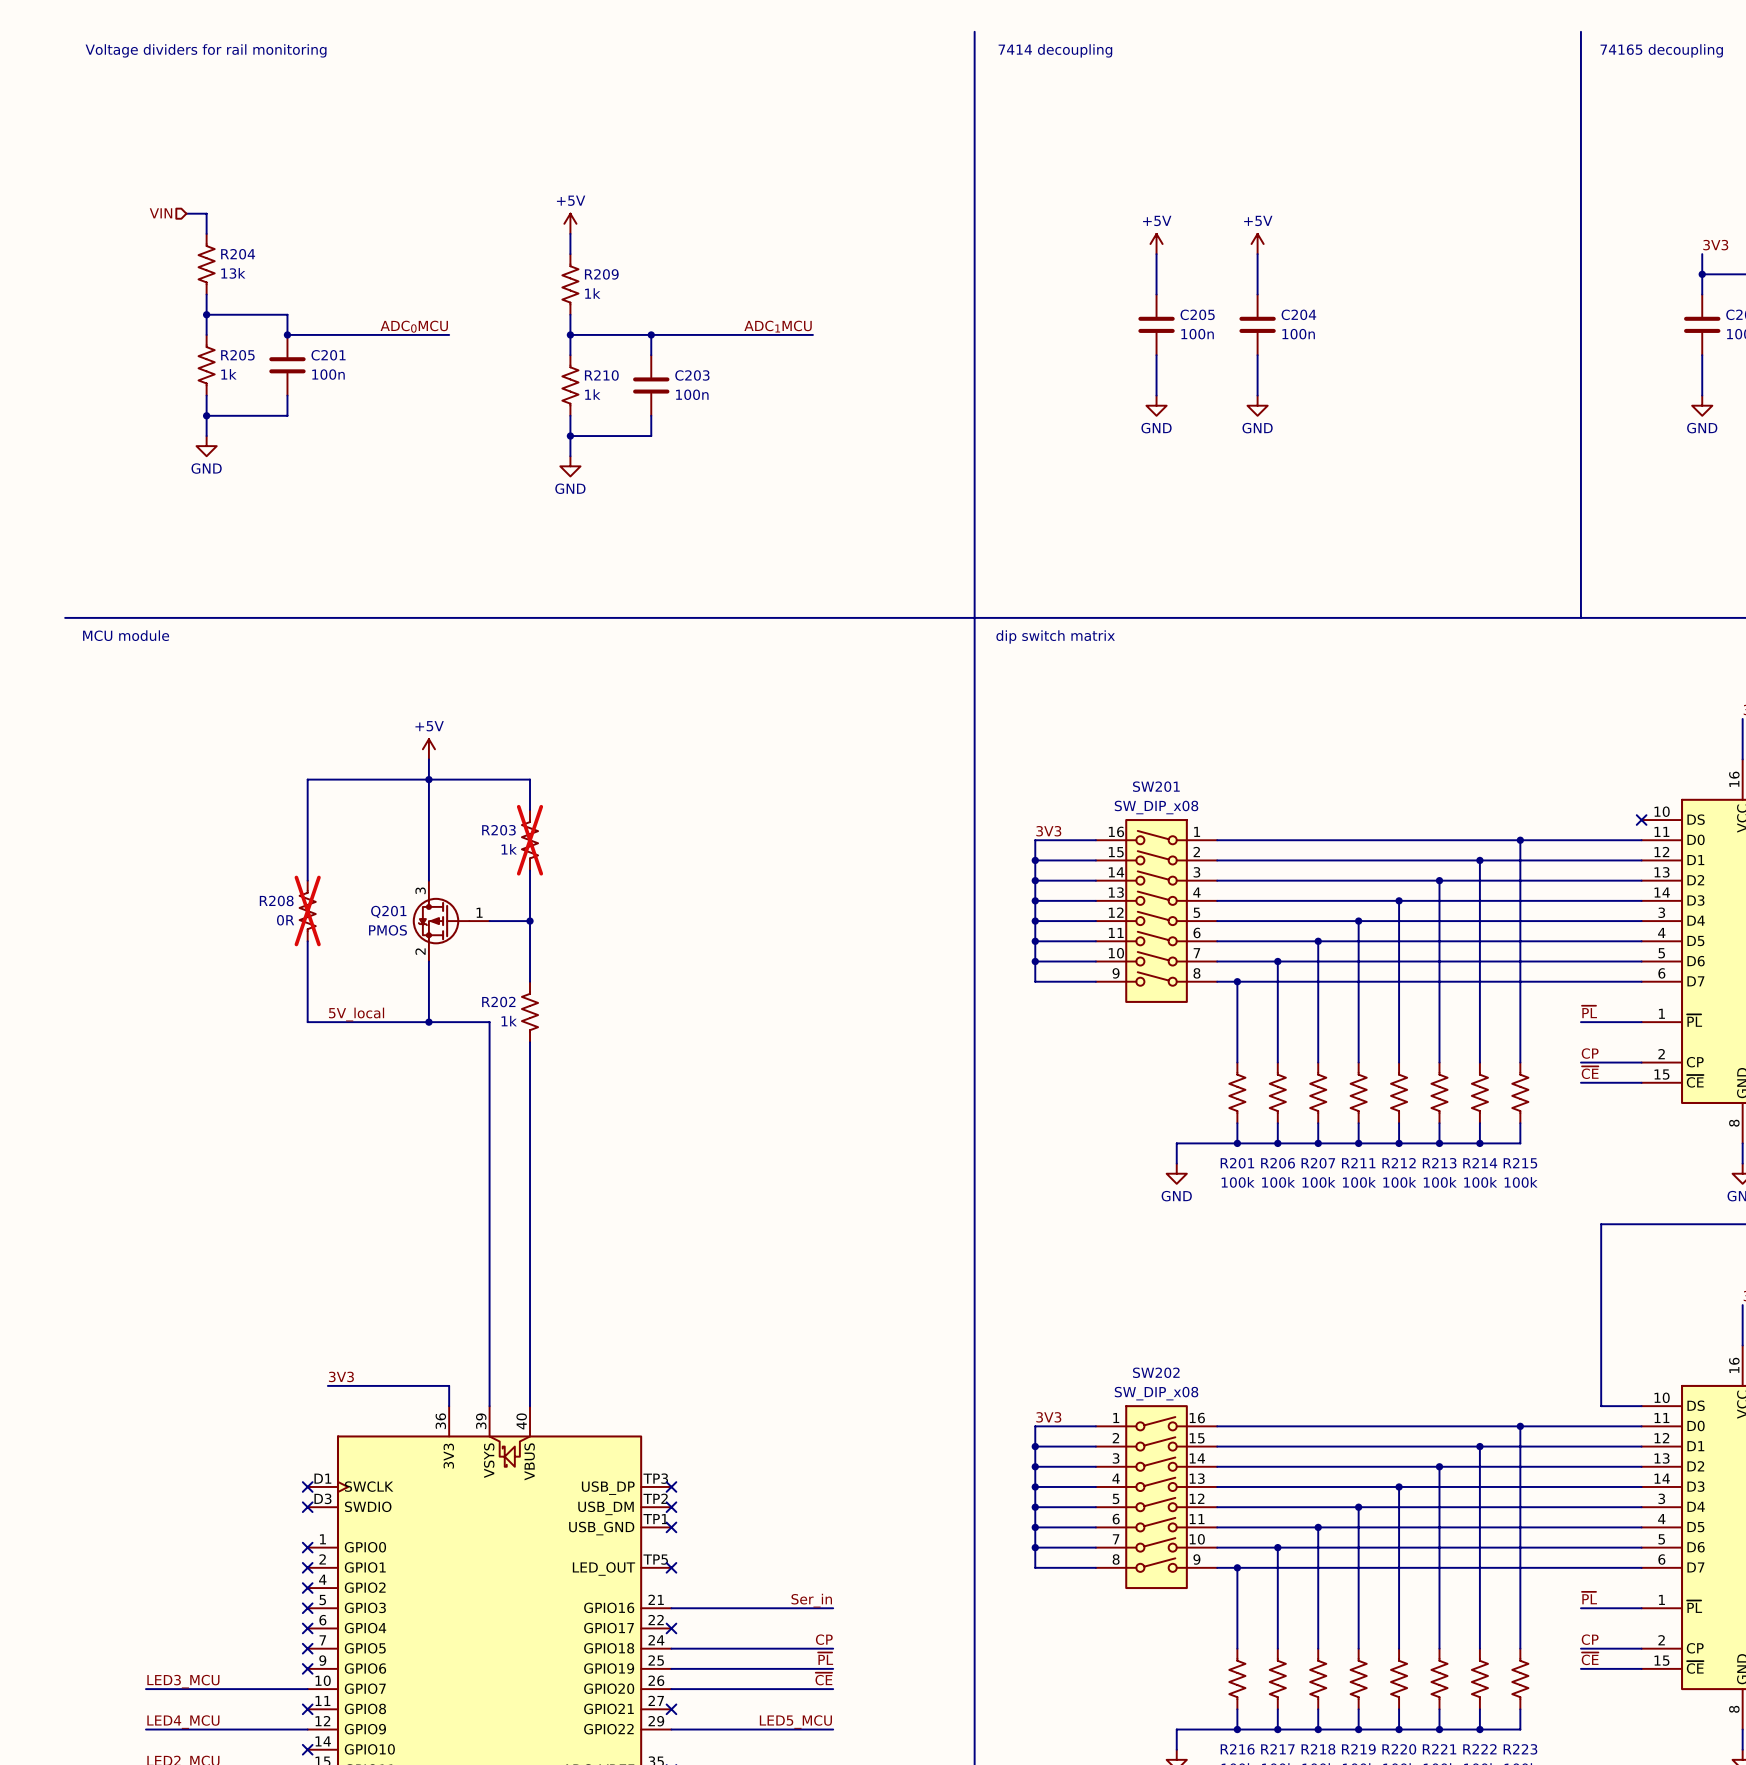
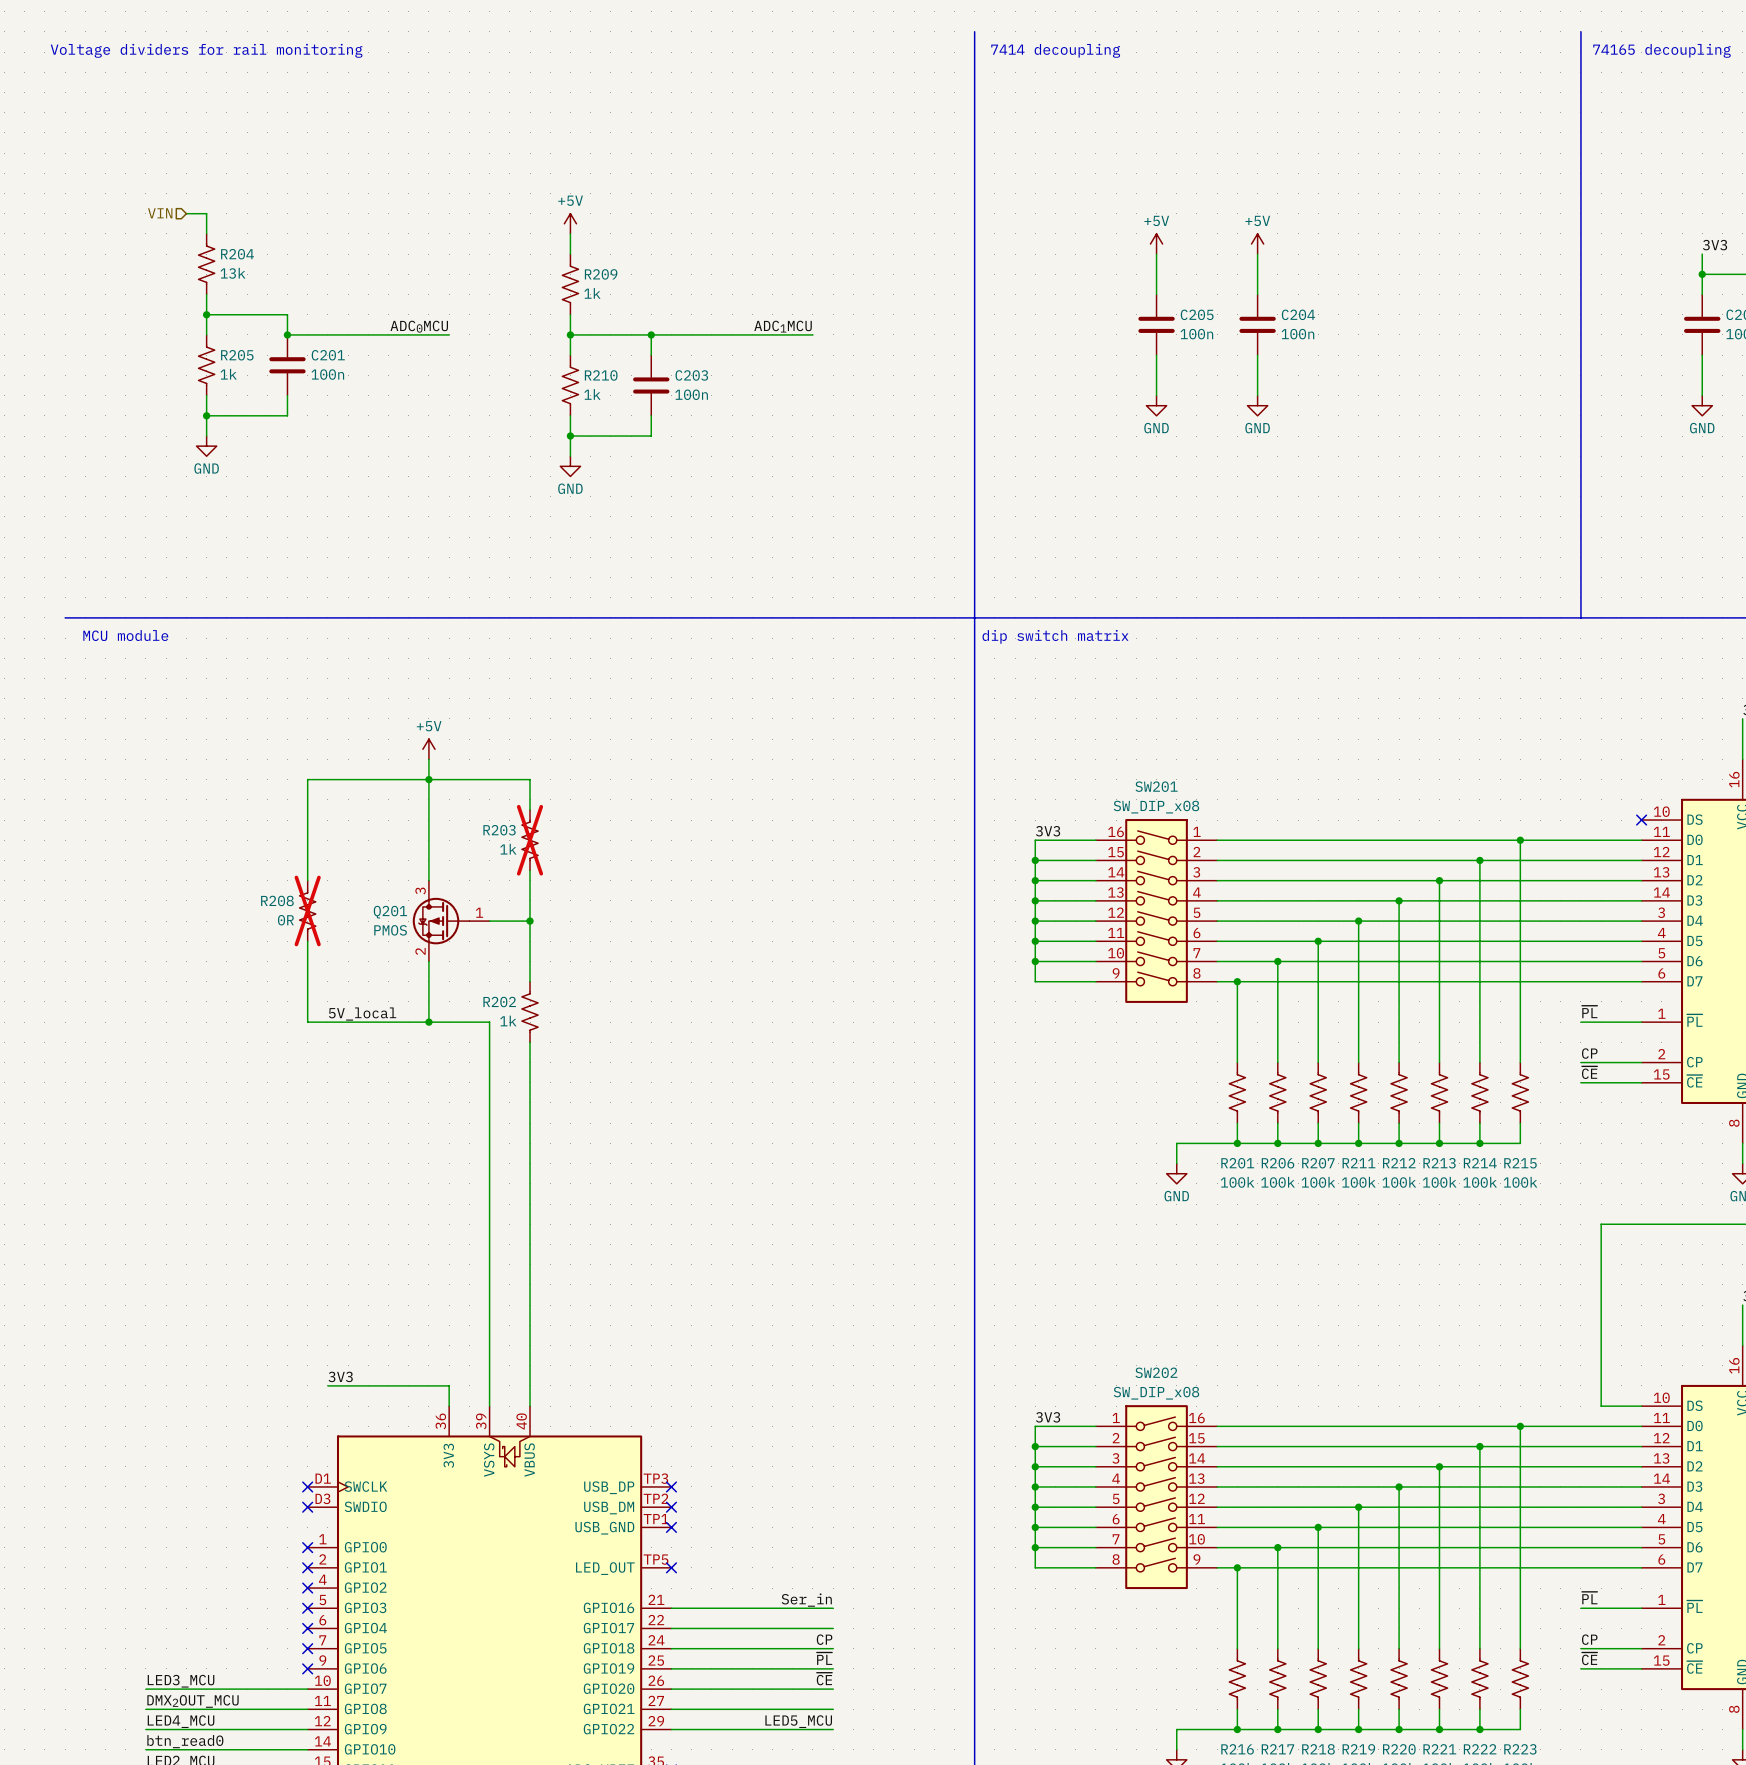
wire: none -> (671, 1628) (833, 1628)
no-connect mark: (671, 1628) -> none
label: none -> DMX2OUT_MCU (193, 1701)
wire: none -> (145, 1709) (307, 1709)
no-connect mark: (307, 1709) -> none
wire: none -> (671, 1709) (833, 1709)
no-connect mark: (671, 1709) -> none
label: none -> btn_read0 (185, 1741)
wire: none -> (145, 1749) (307, 1749)
no-connect mark: (307, 1749) -> none

